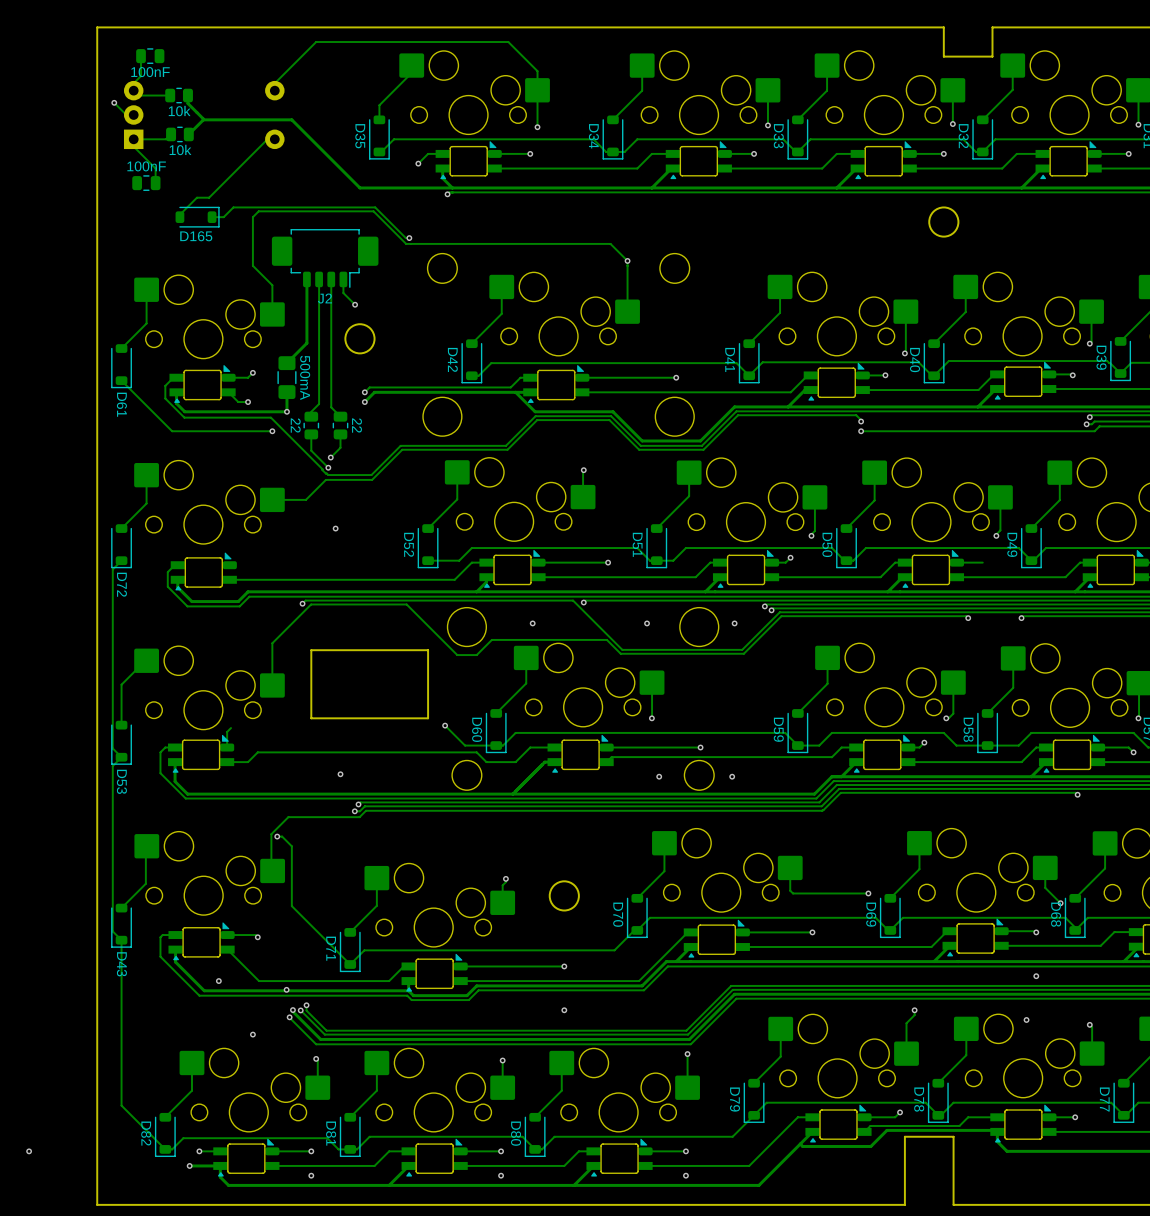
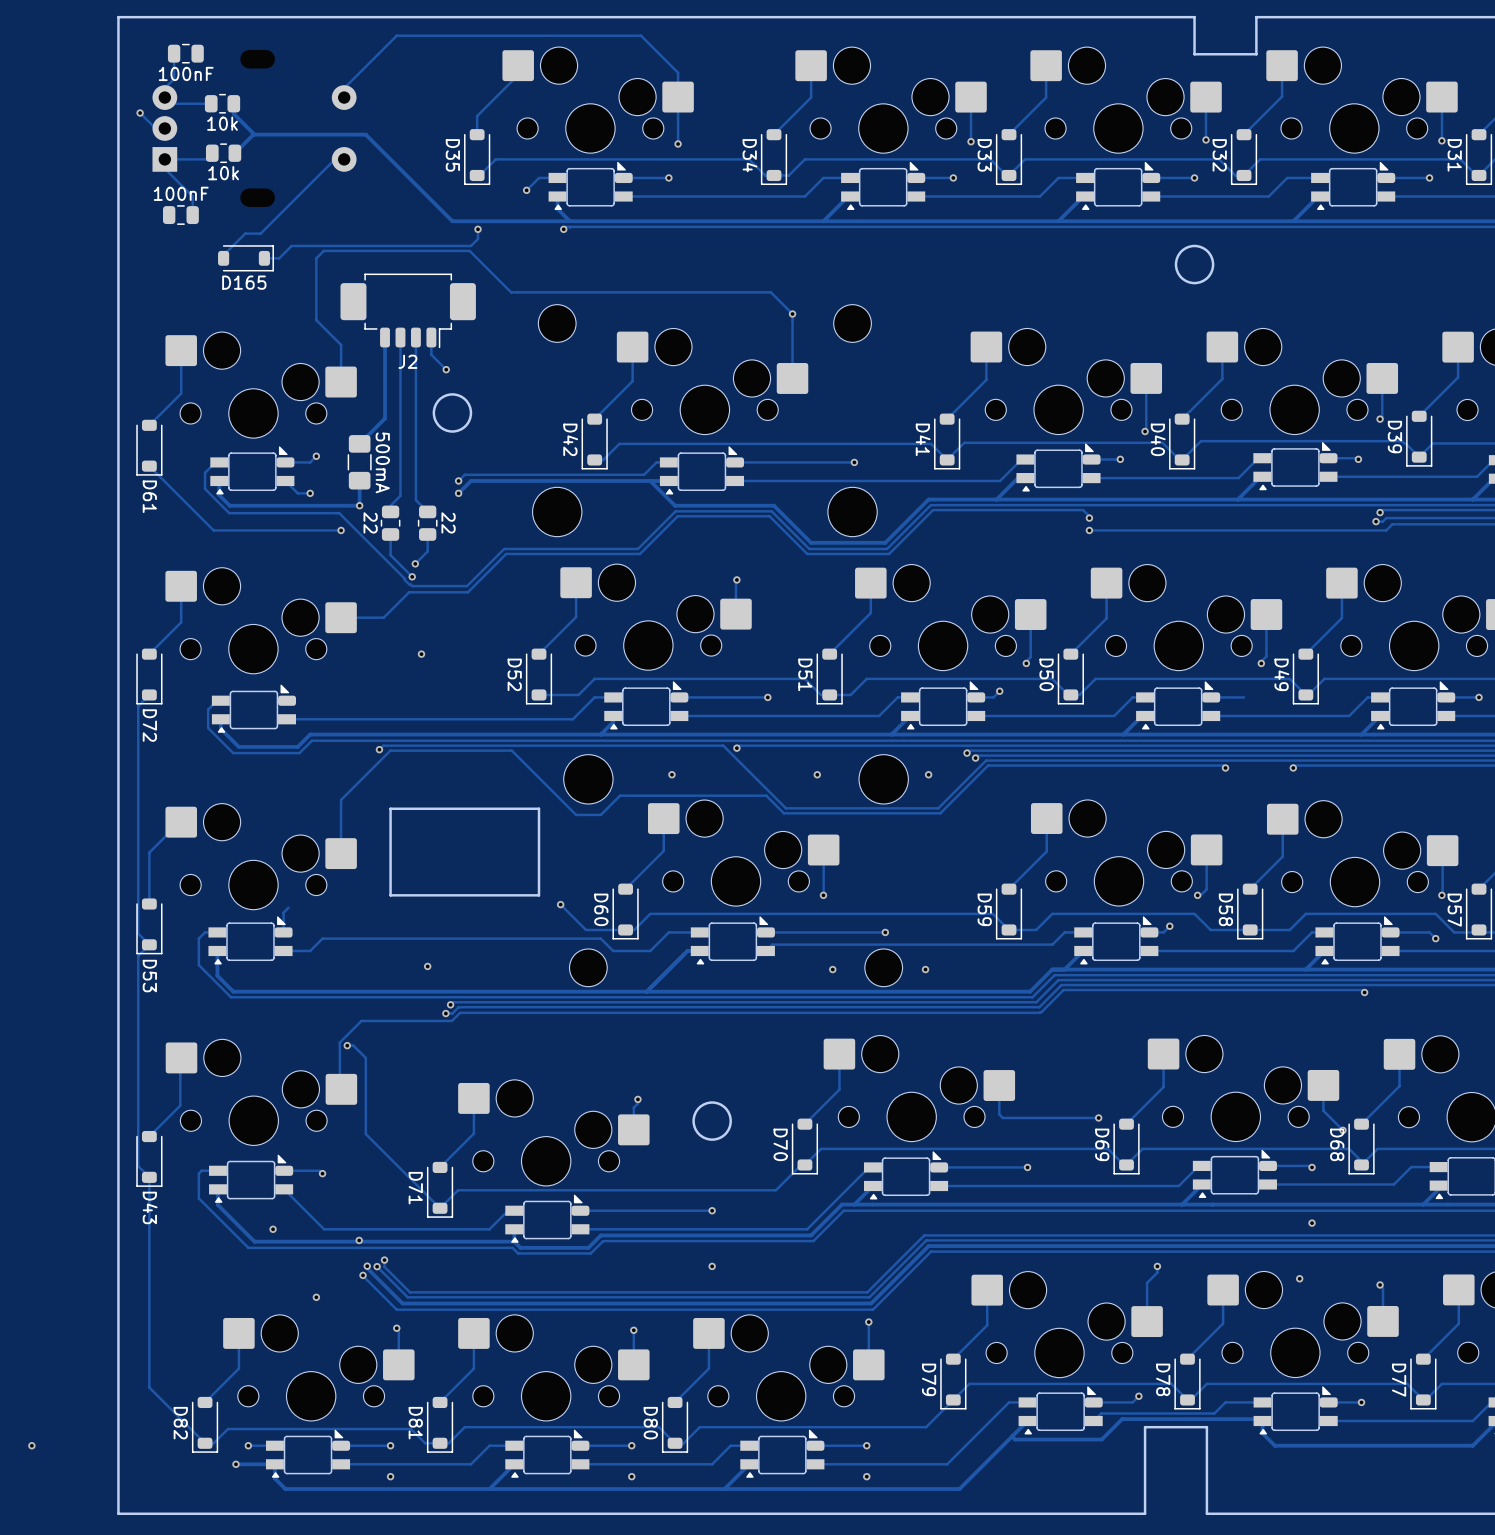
track: (374, 207) (405, 238) (409, 238) -> (470, 245) (478, 238) (478, 229)
via position: (409, 238) -> (478, 229)

